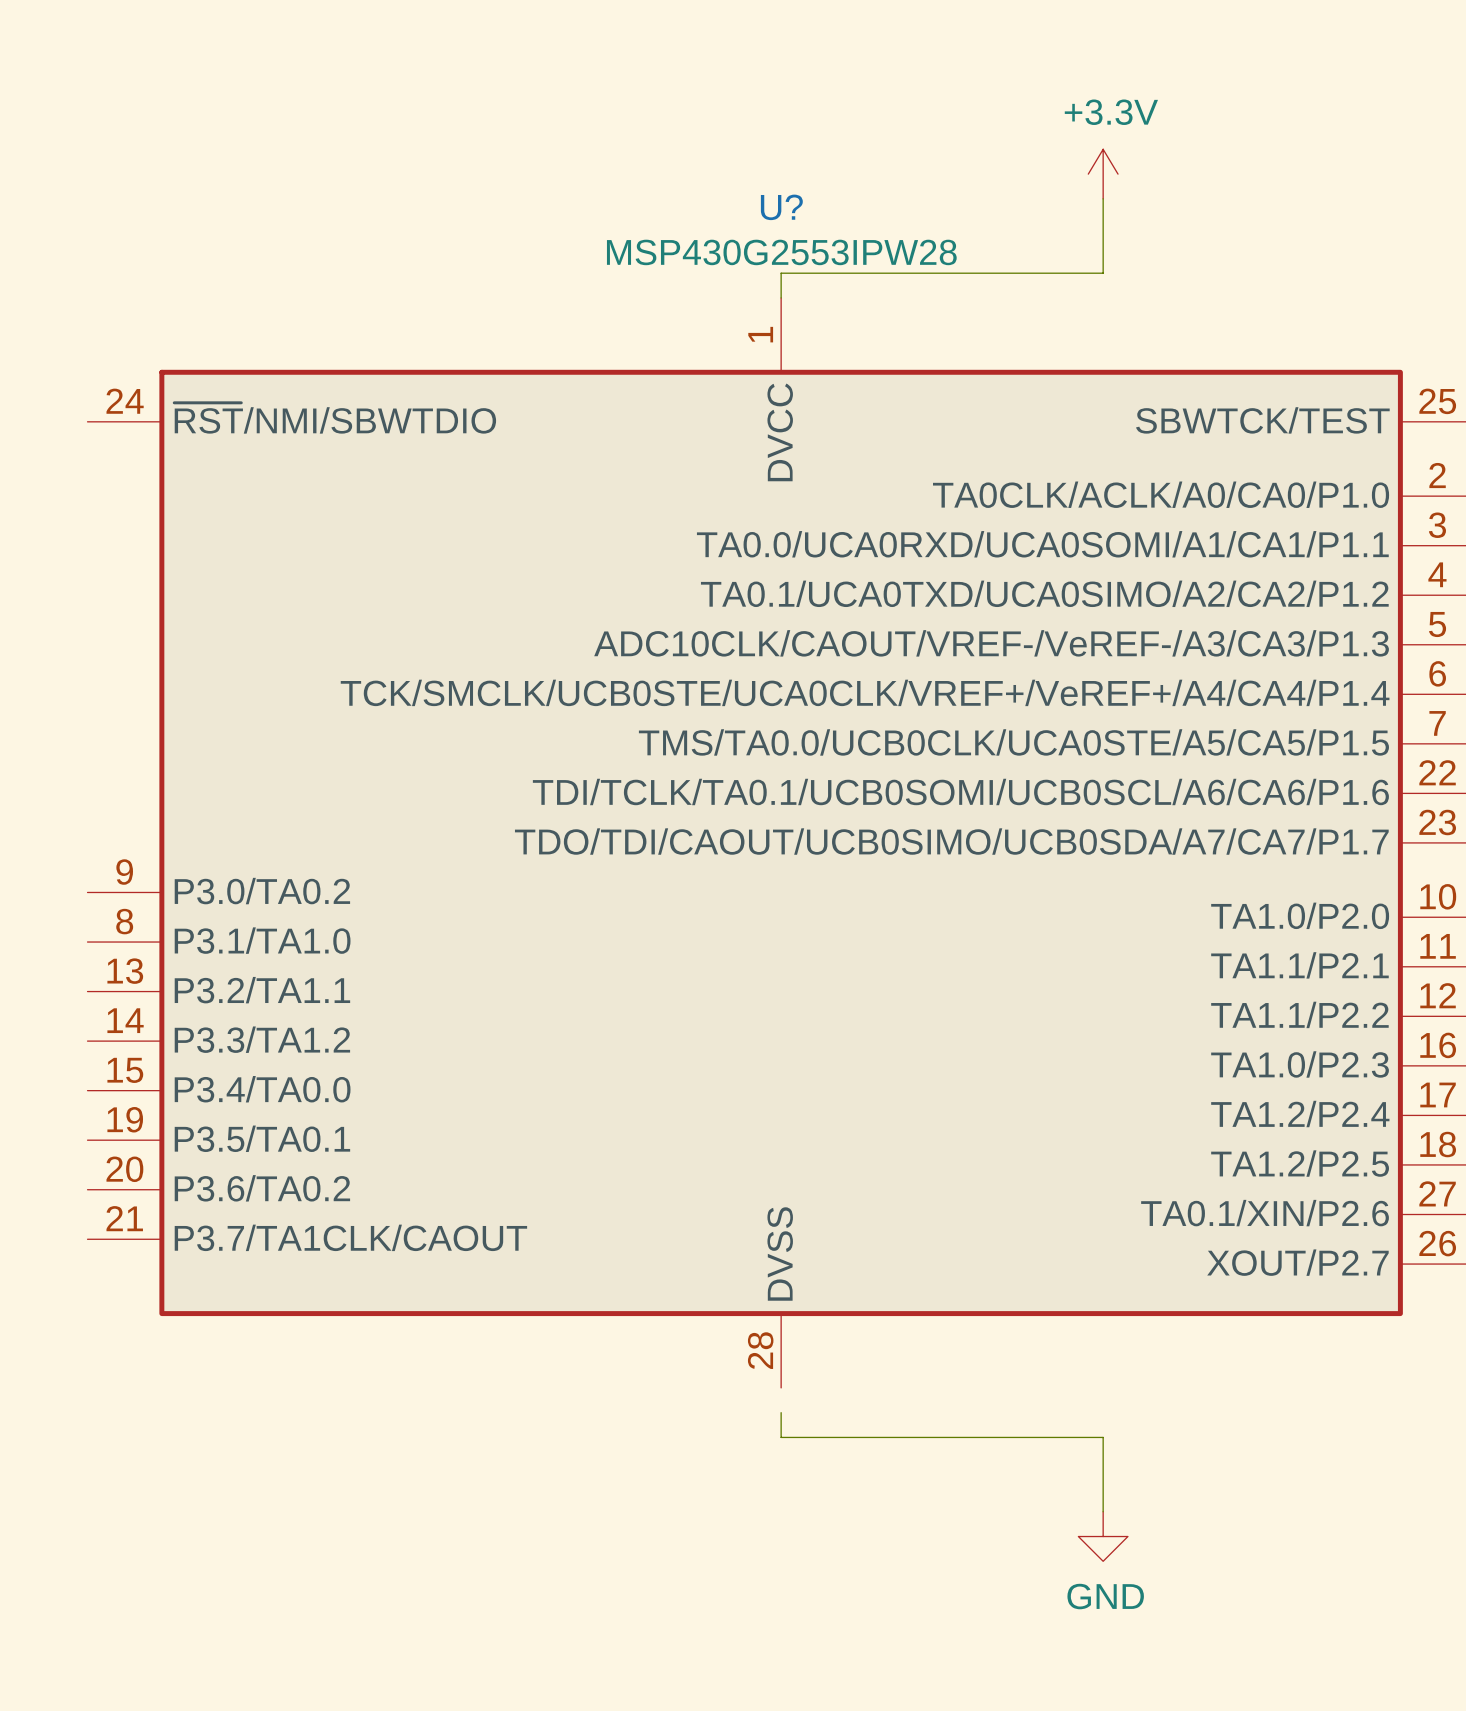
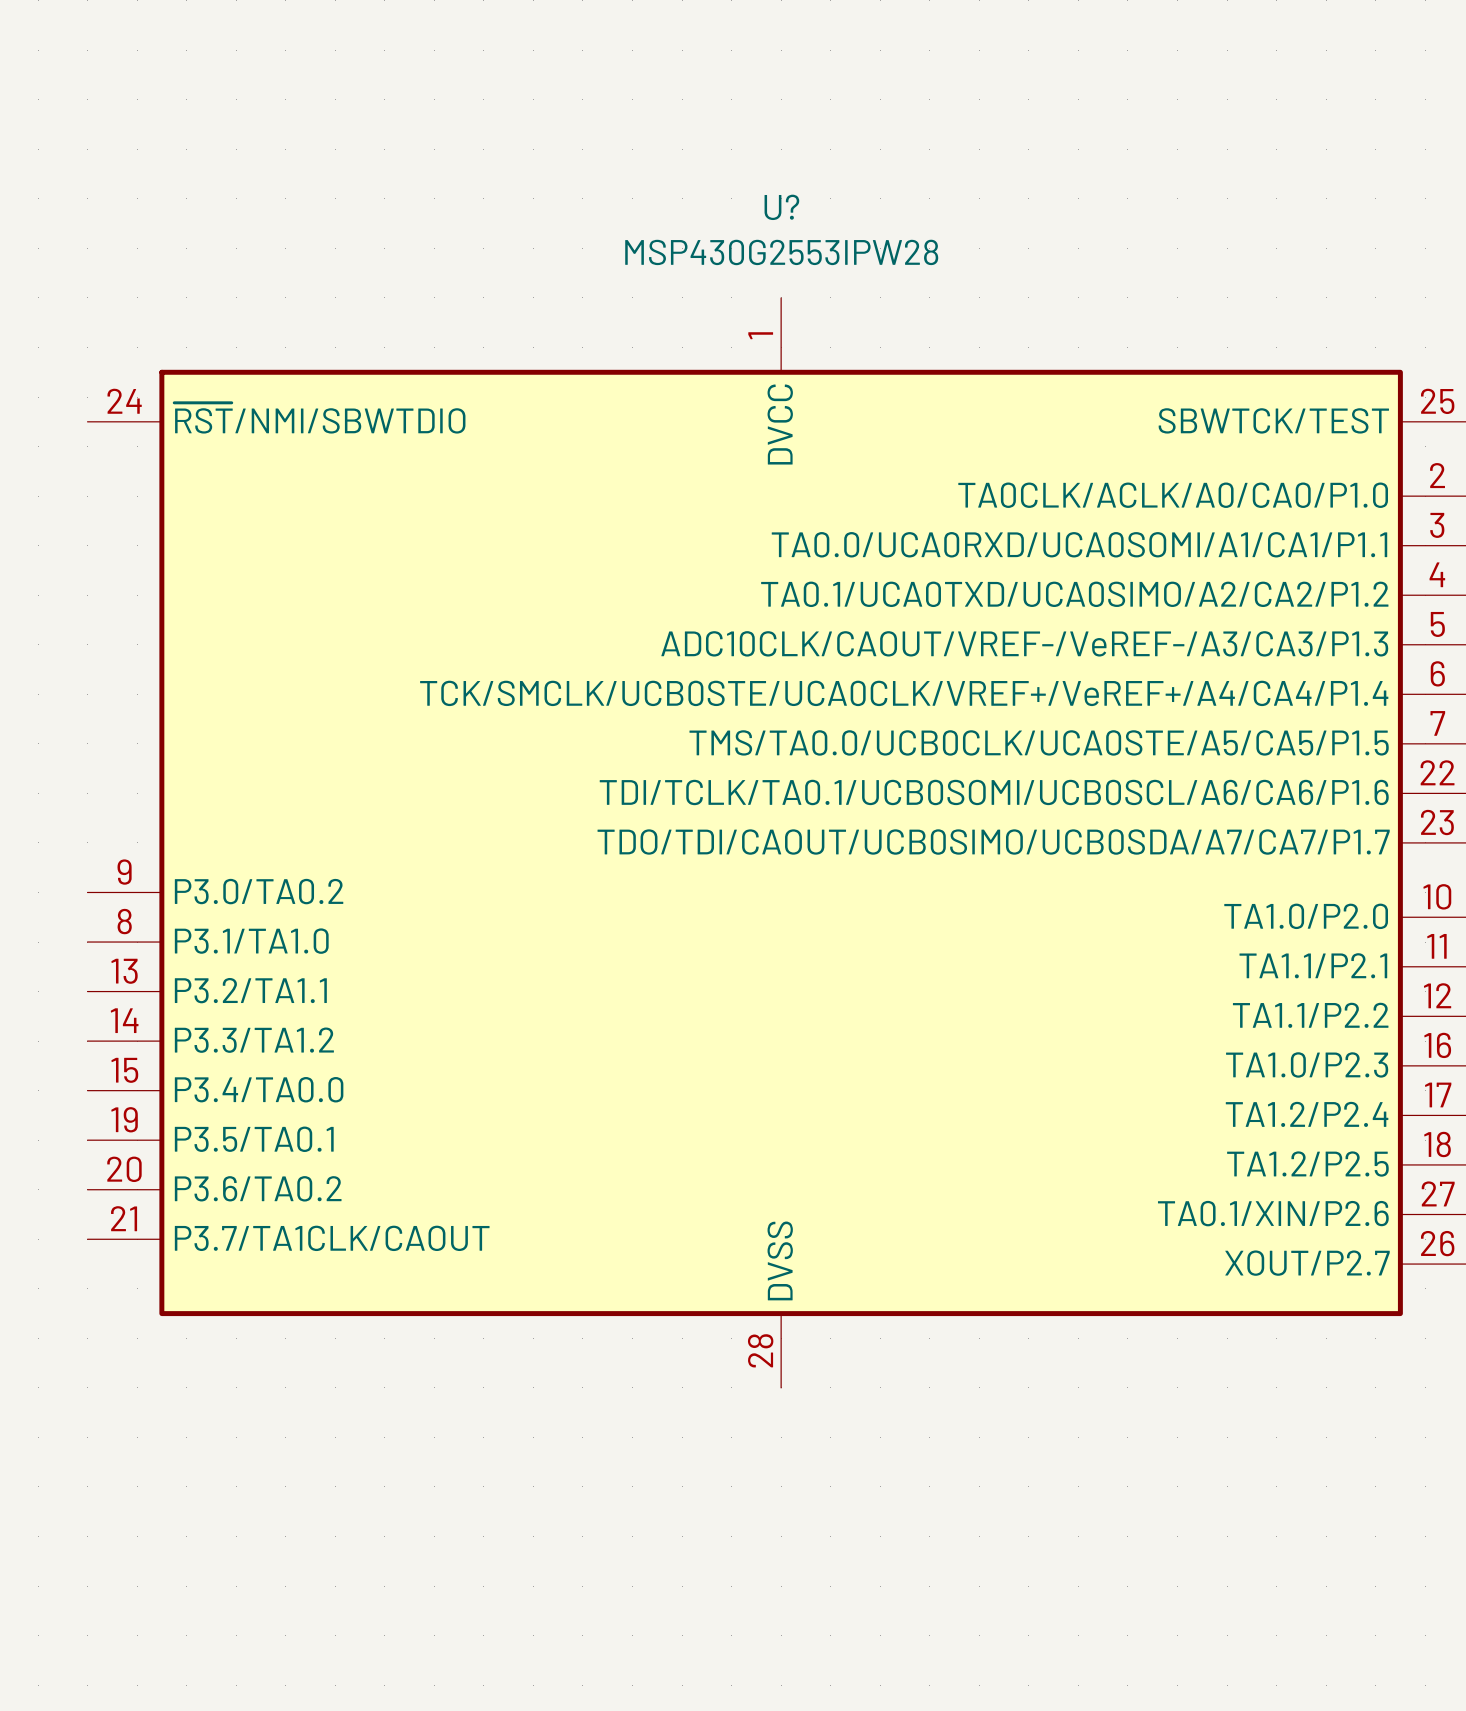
power symbol: +3.3V (1103, 174) -> none
wire: (1103, 198) (1103, 273) (781, 273) (781, 297) -> none
wire: (781, 1412) (781, 1437) (1103, 1437) (1103, 1511) -> none
power symbol: GND (1103, 1536) -> none

